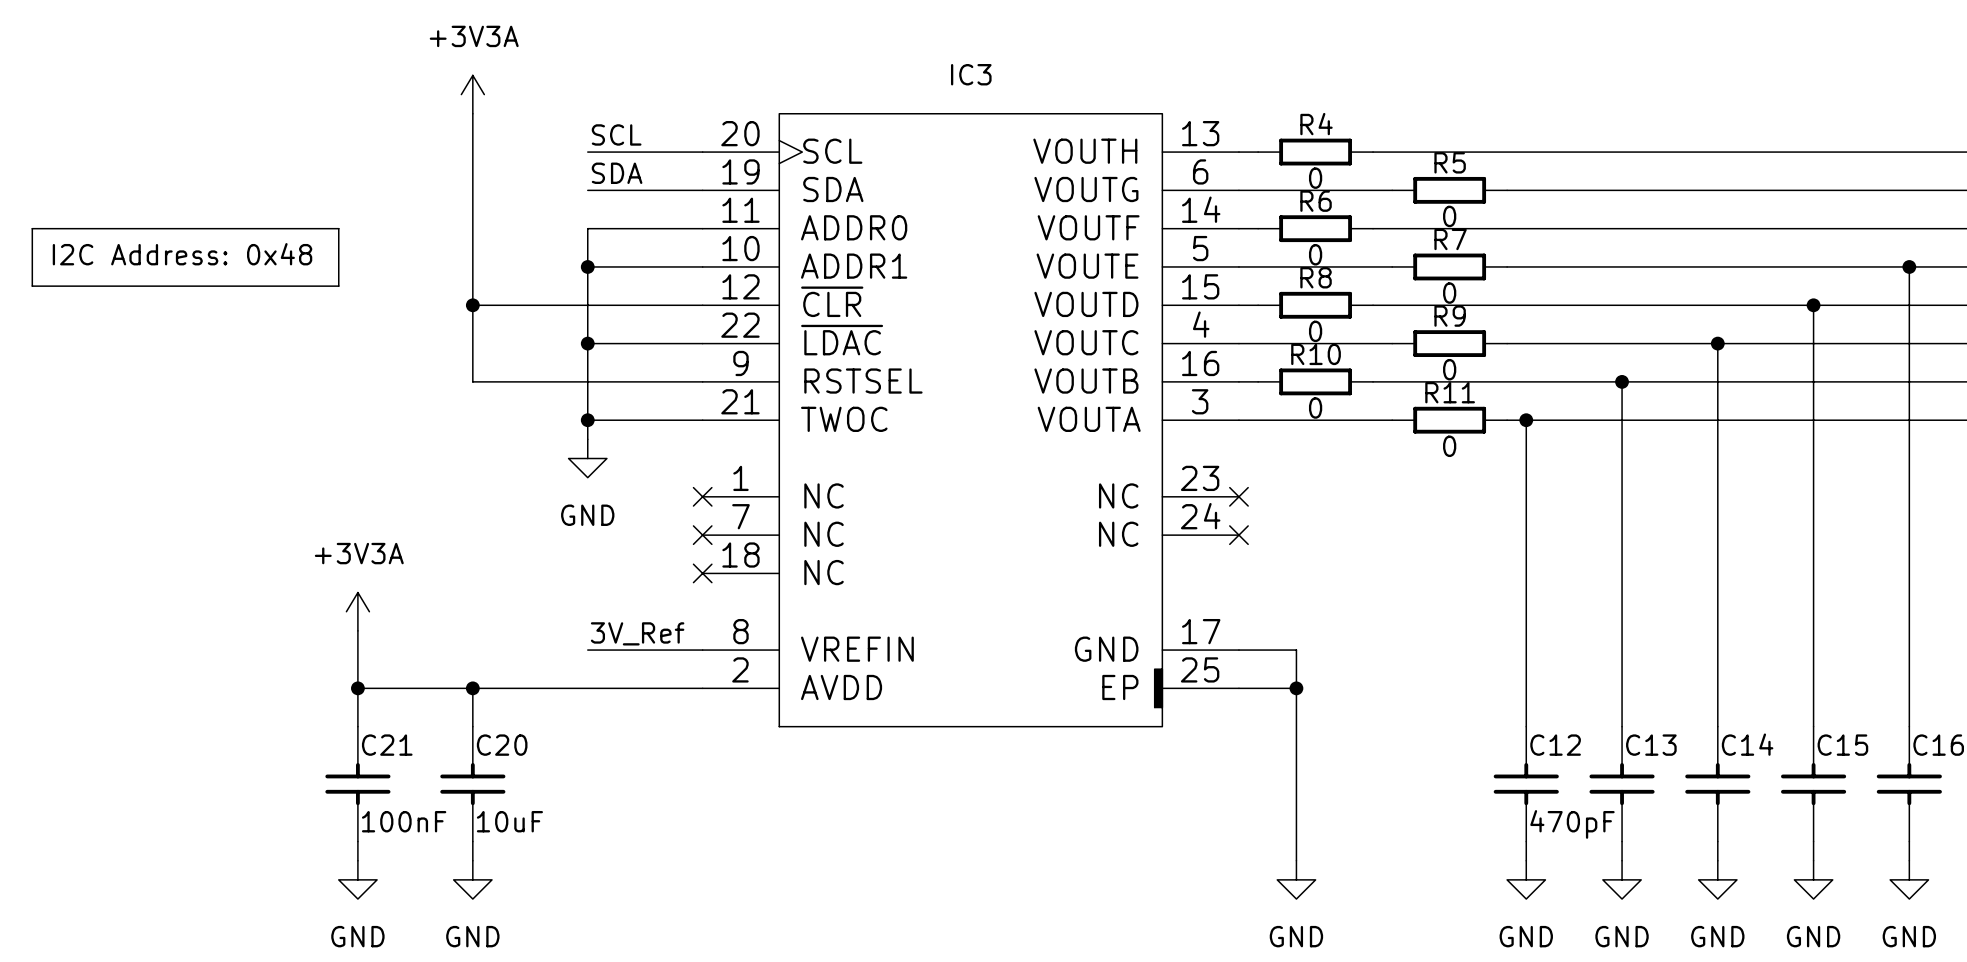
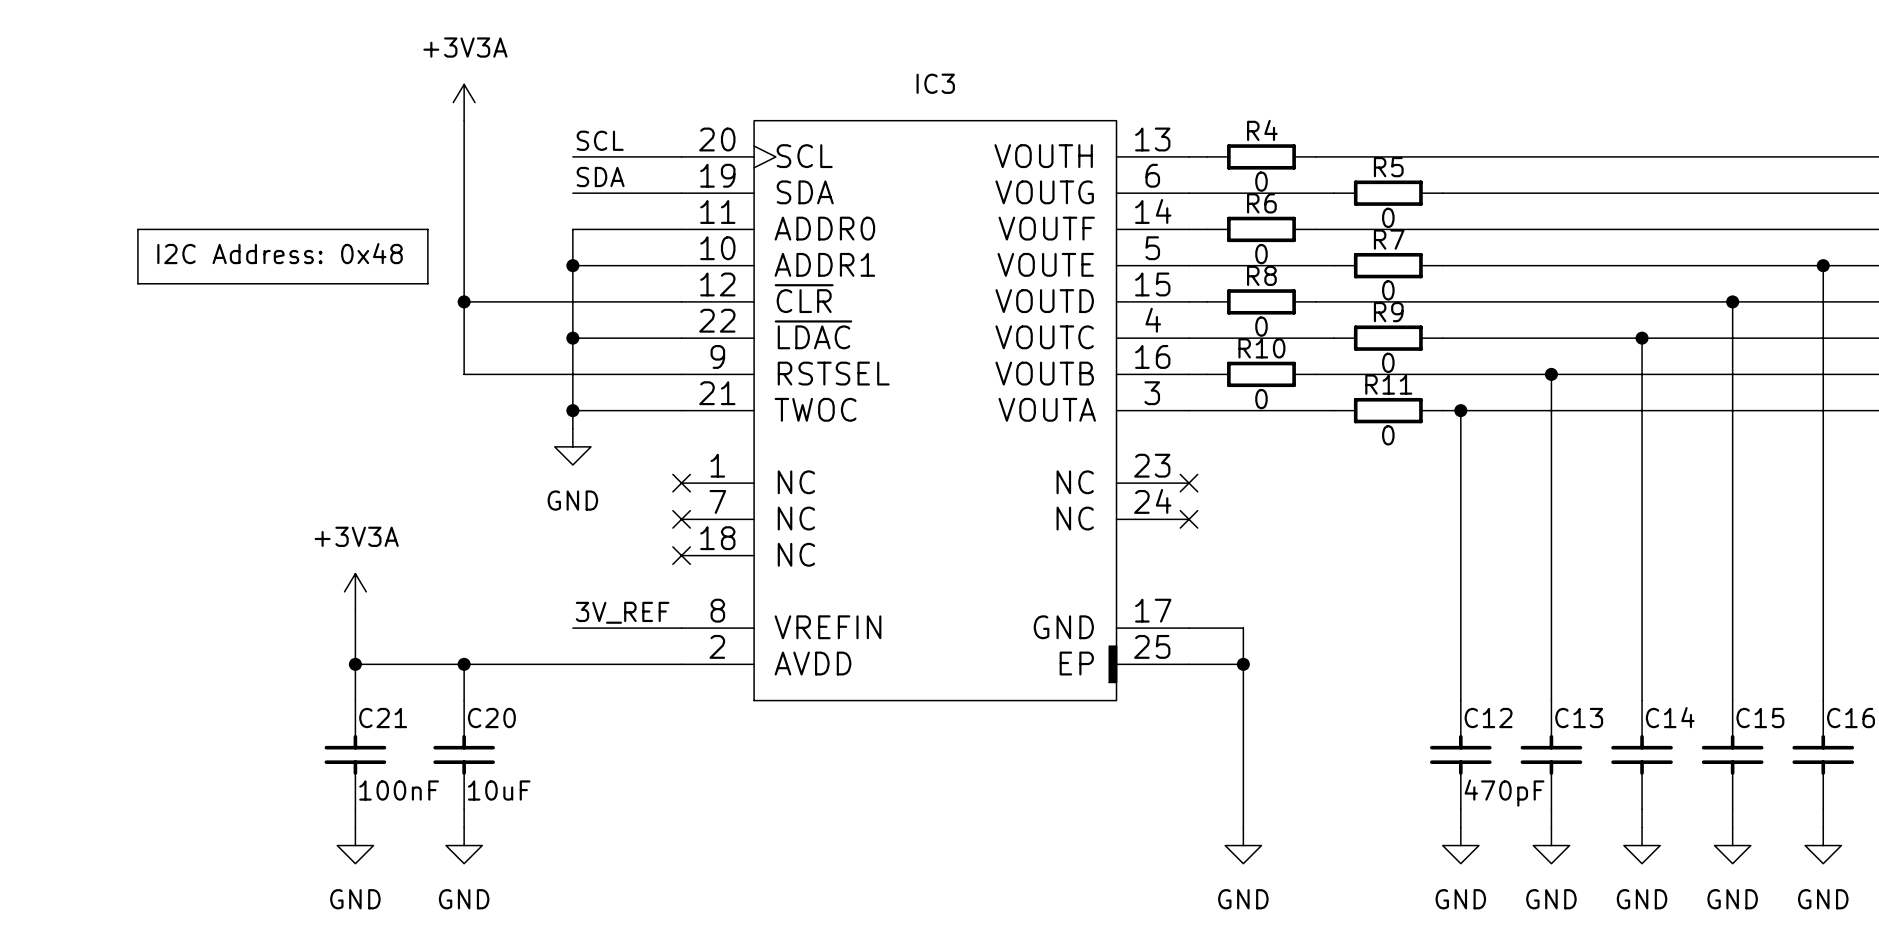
line: (128, 228) (32, 228) (32, 286) (128, 286) -> (137, 229) (137, 283)
line: (338, 228) (338, 286) -> (337, 229) (427, 229) (427, 283) (337, 283)
text position: I2C Address: 0x48 (182, 254) -> I2C Address: 0x48 (280, 253)
label: 3V_Ref (637, 633) -> 3V_REF (622, 612)

